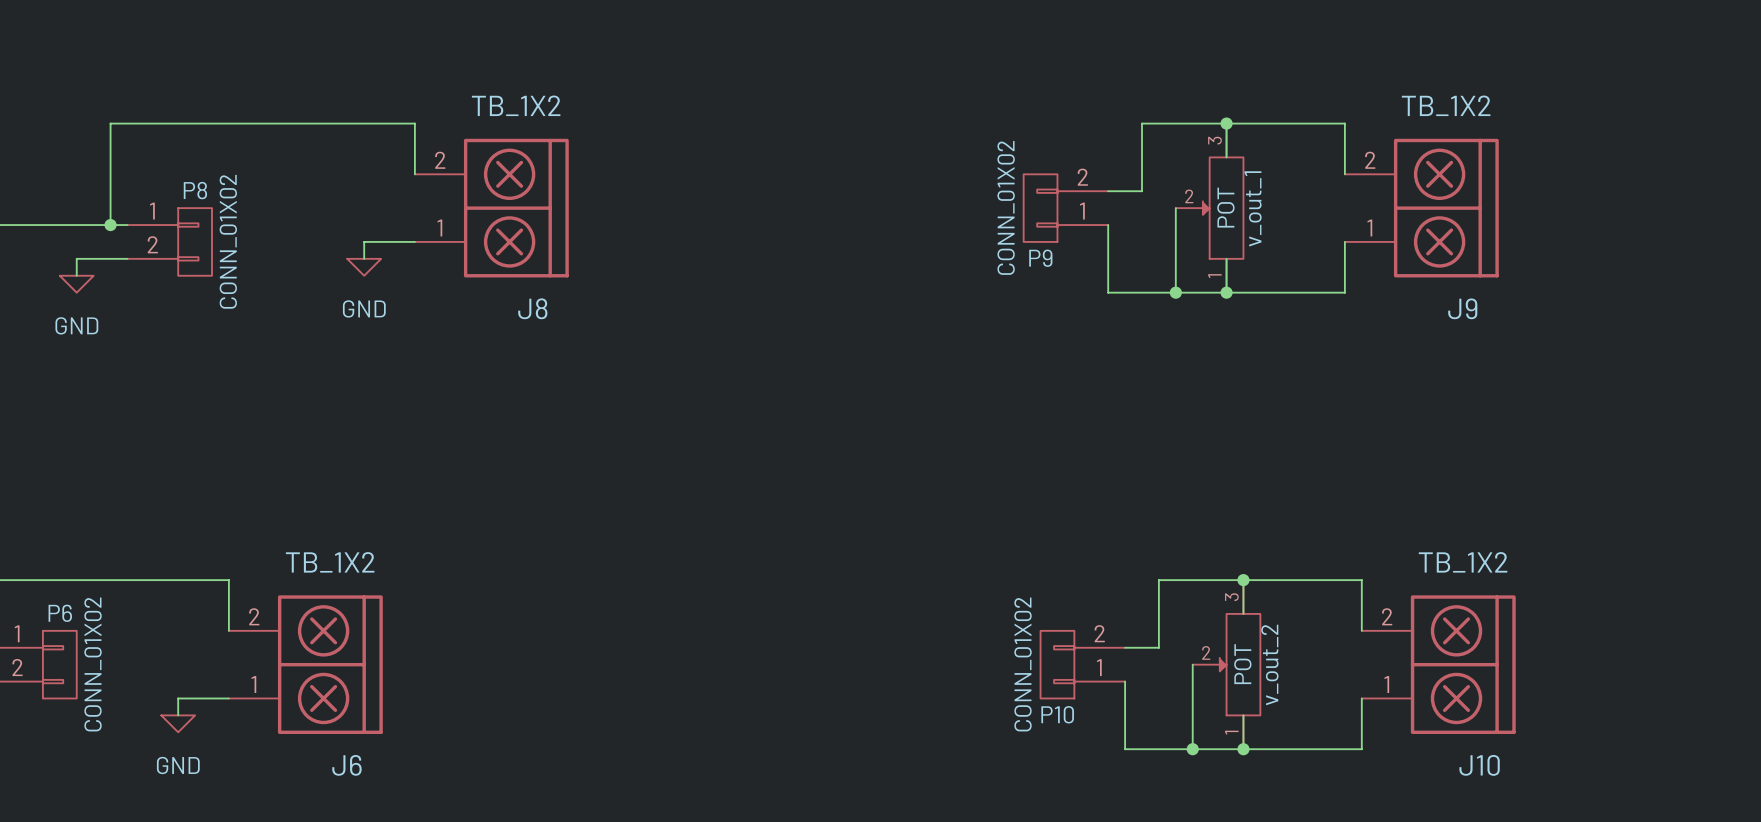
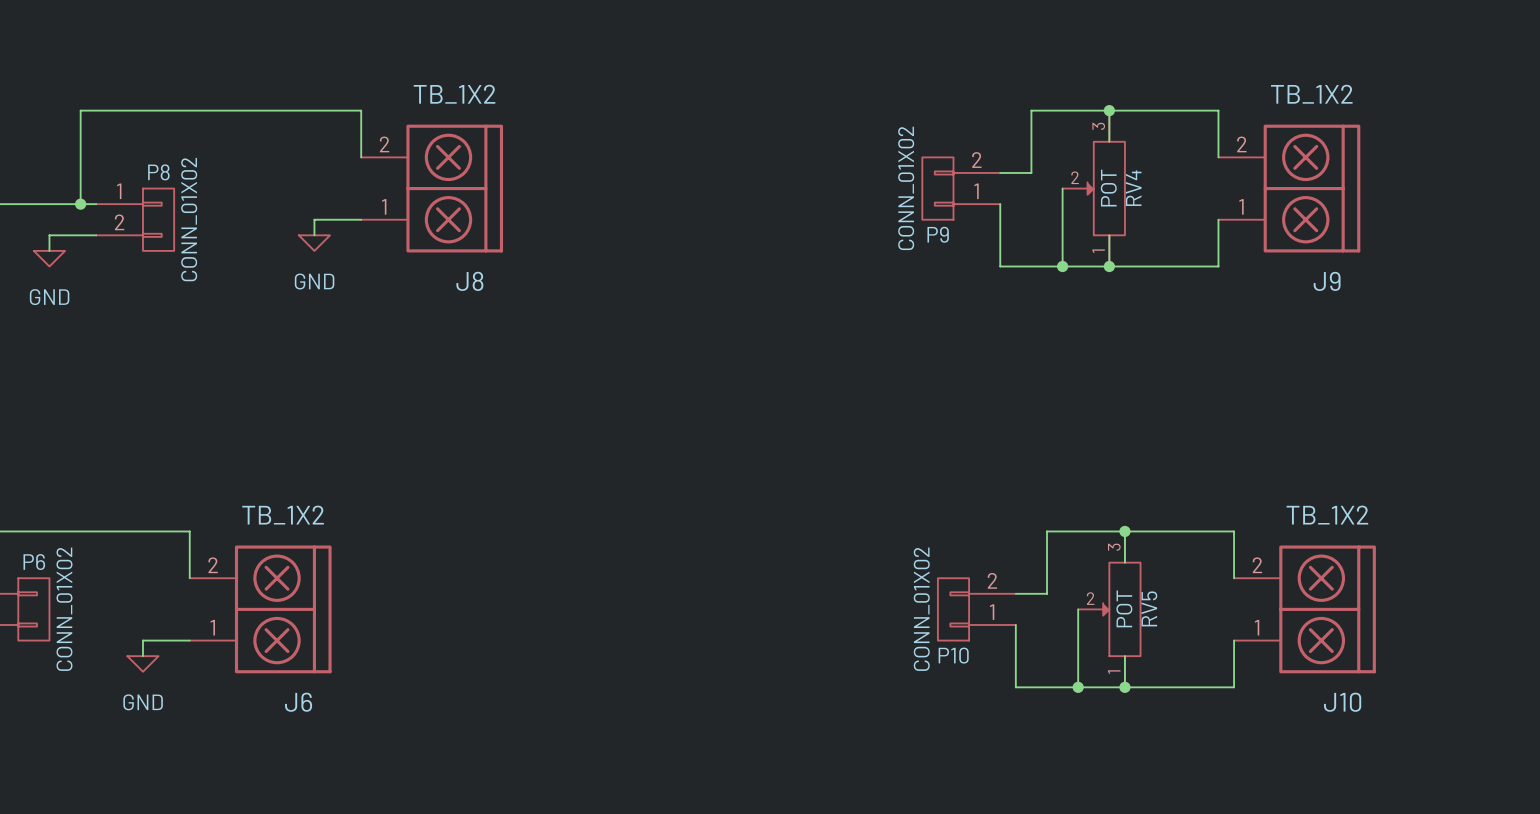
v_out_1 name: v_out_1 (1253, 208) -> RV4 (1133, 188)
v_out_2 name: v_out_2 (1269, 664) -> RV5 (1149, 608)

